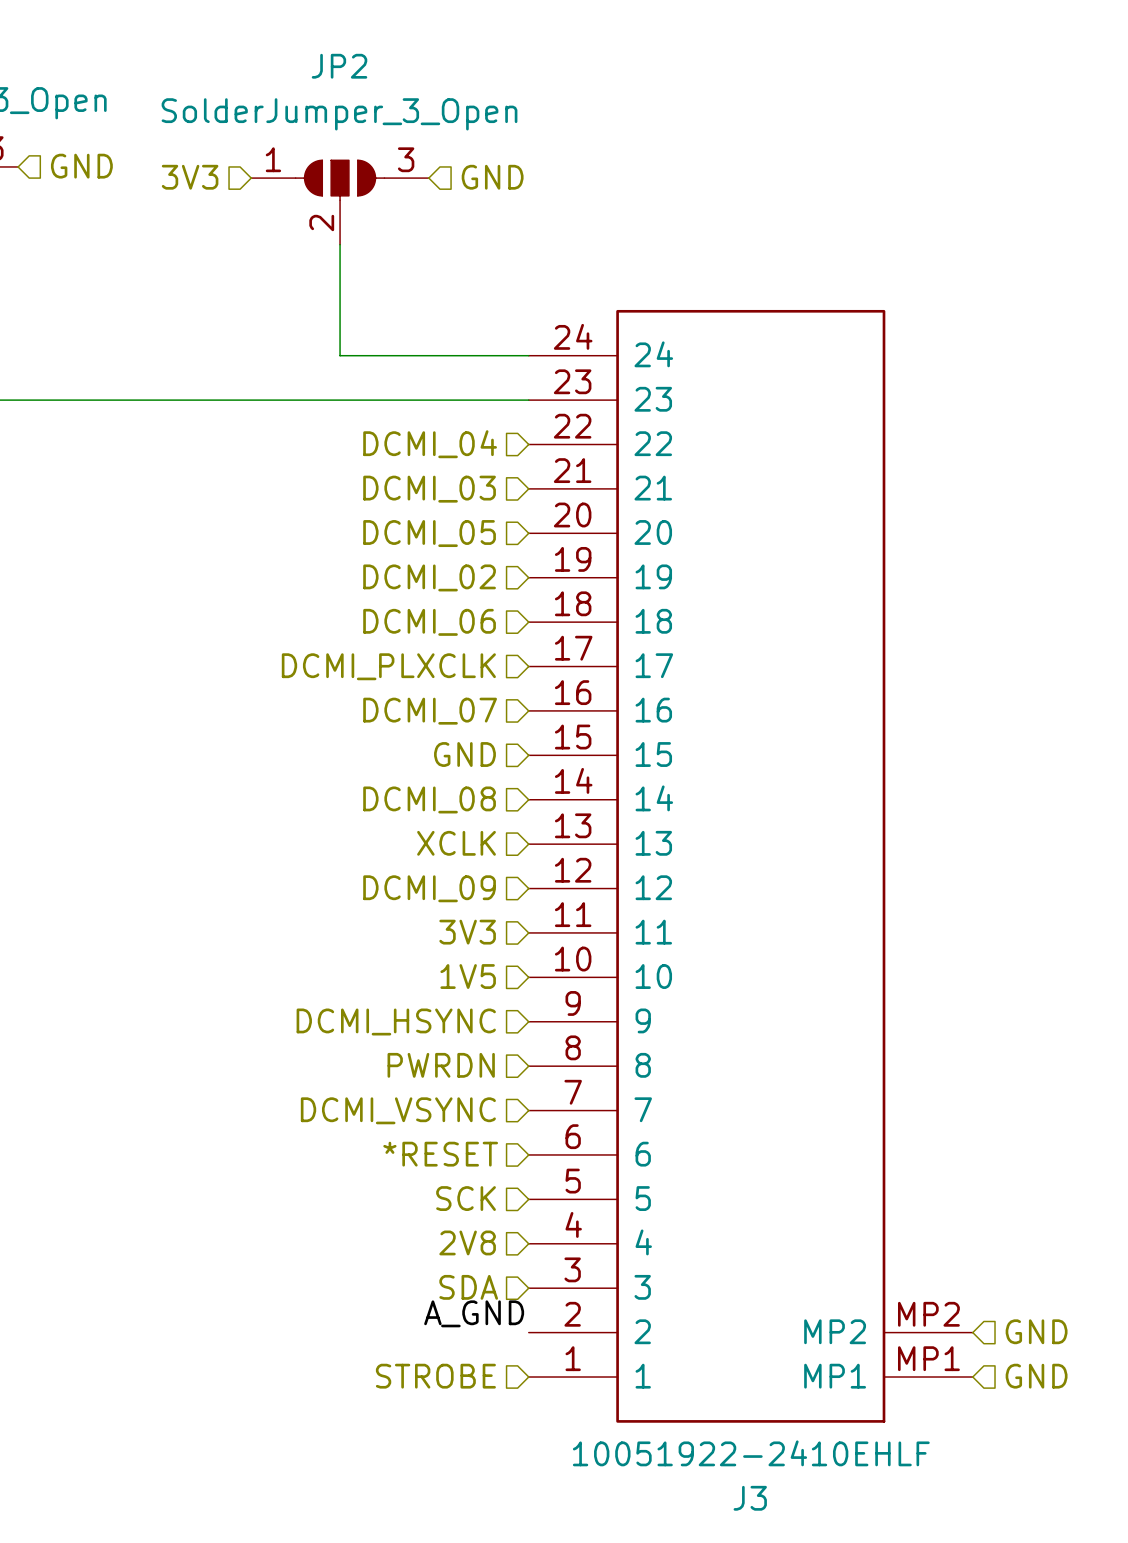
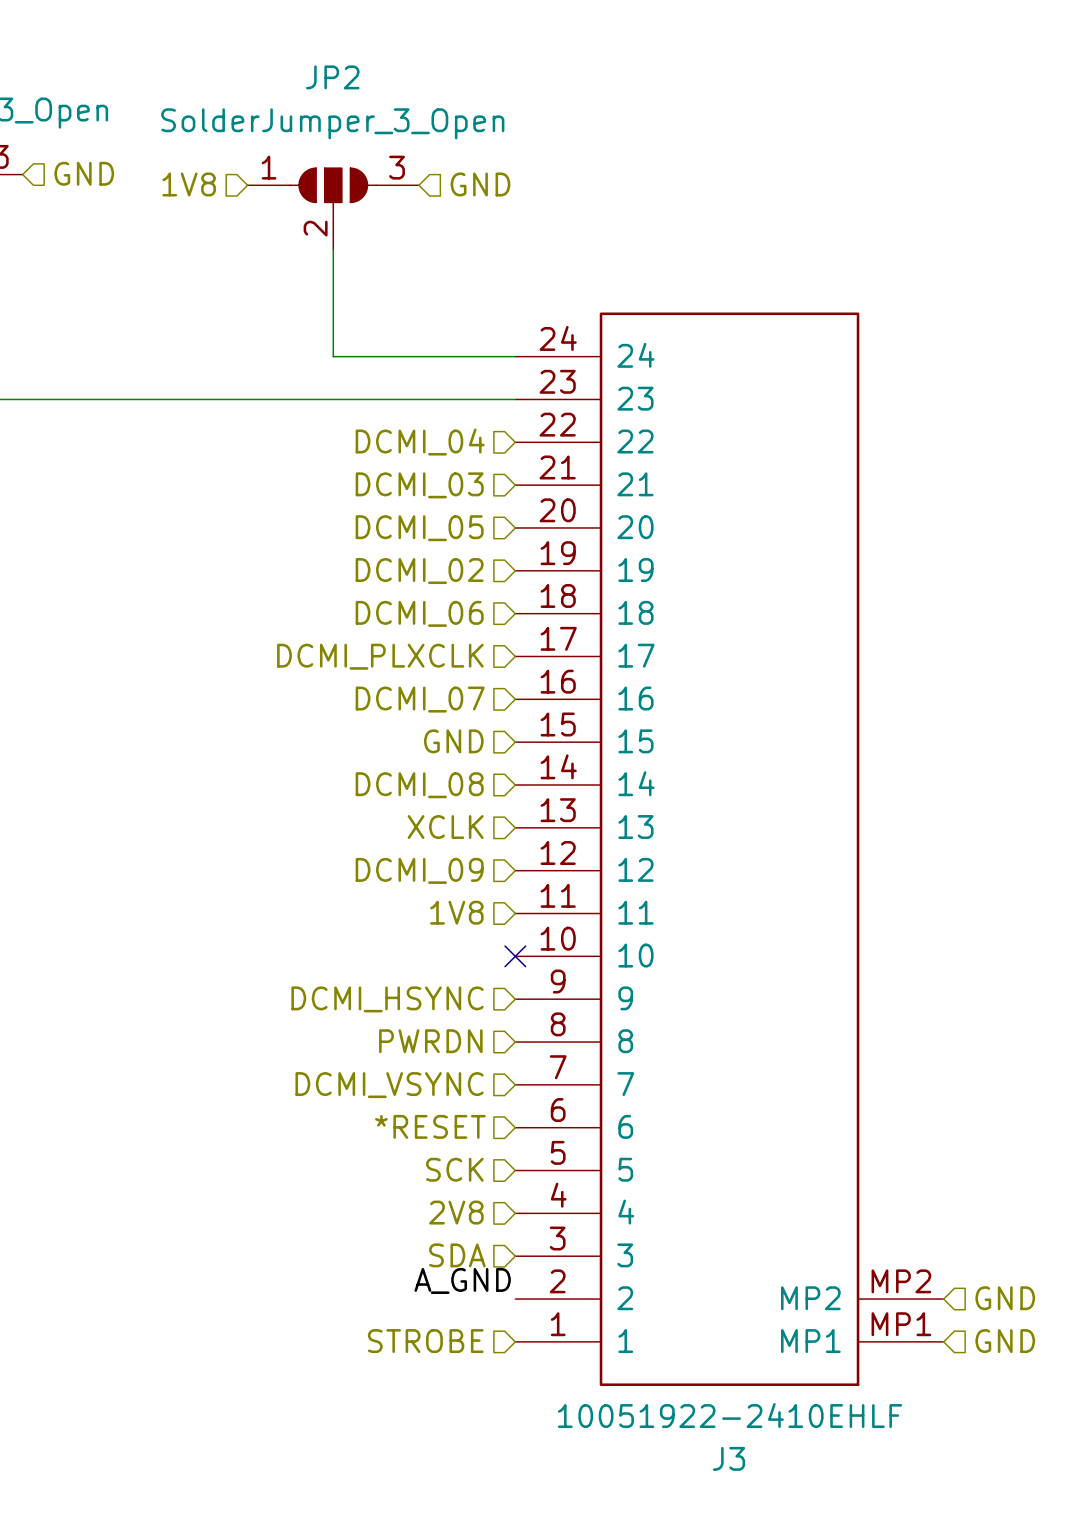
hierarchical label: 3V3 (190, 177) -> 1V8 (189, 184)
hierarchical label: 3V3 (467, 932) -> 1V8 (456, 912)
hierarchical label: 1V5 (468, 976) -> none
no-connect mark: none -> (515, 956)

